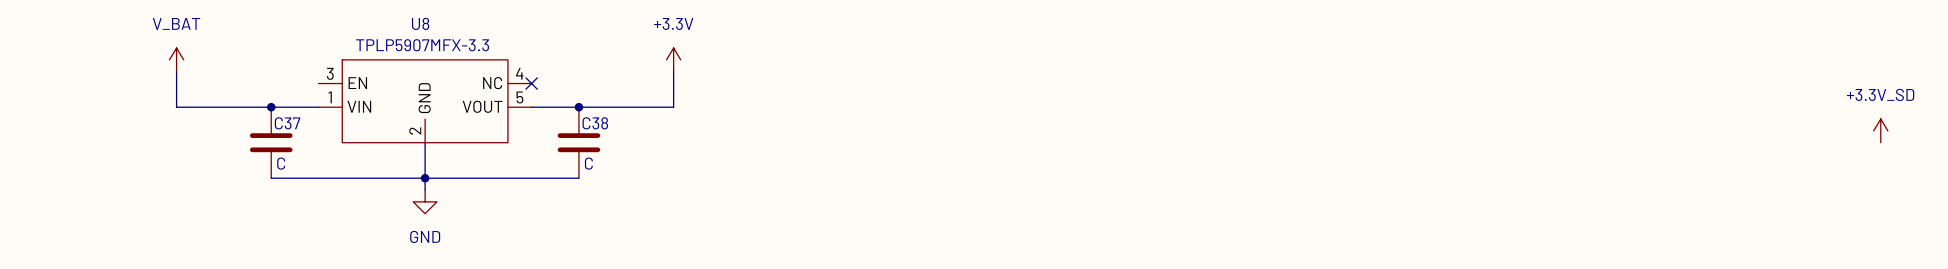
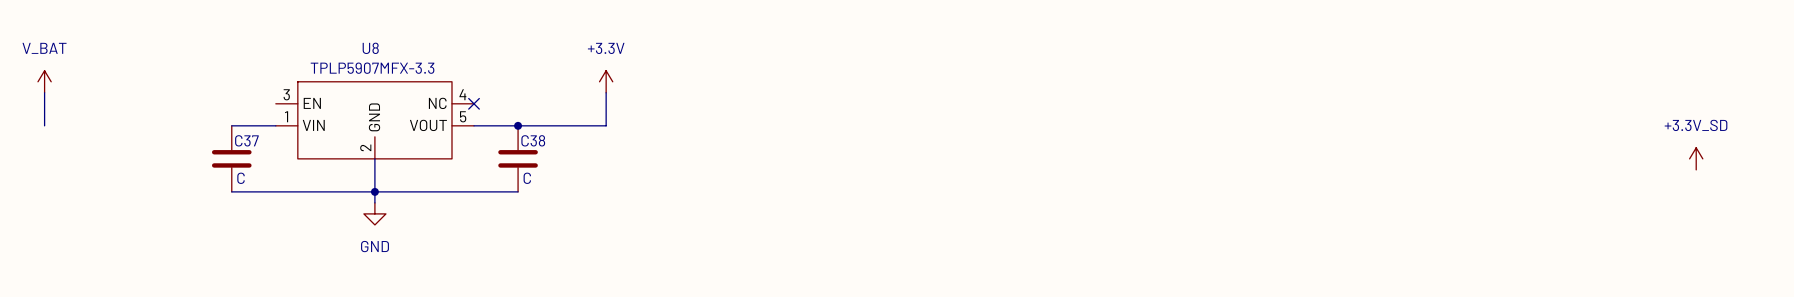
power symbol position: V_BAT (176, 59) -> V_BAT (44, 81)
wire: none -> (44, 92) (44, 125)
wire: (176, 71) (176, 107) (271, 107) -> none
junction: (271, 107) -> none
power symbol position: +3.3V_SD (1880, 130) -> +3.3V_SD (1696, 158)

